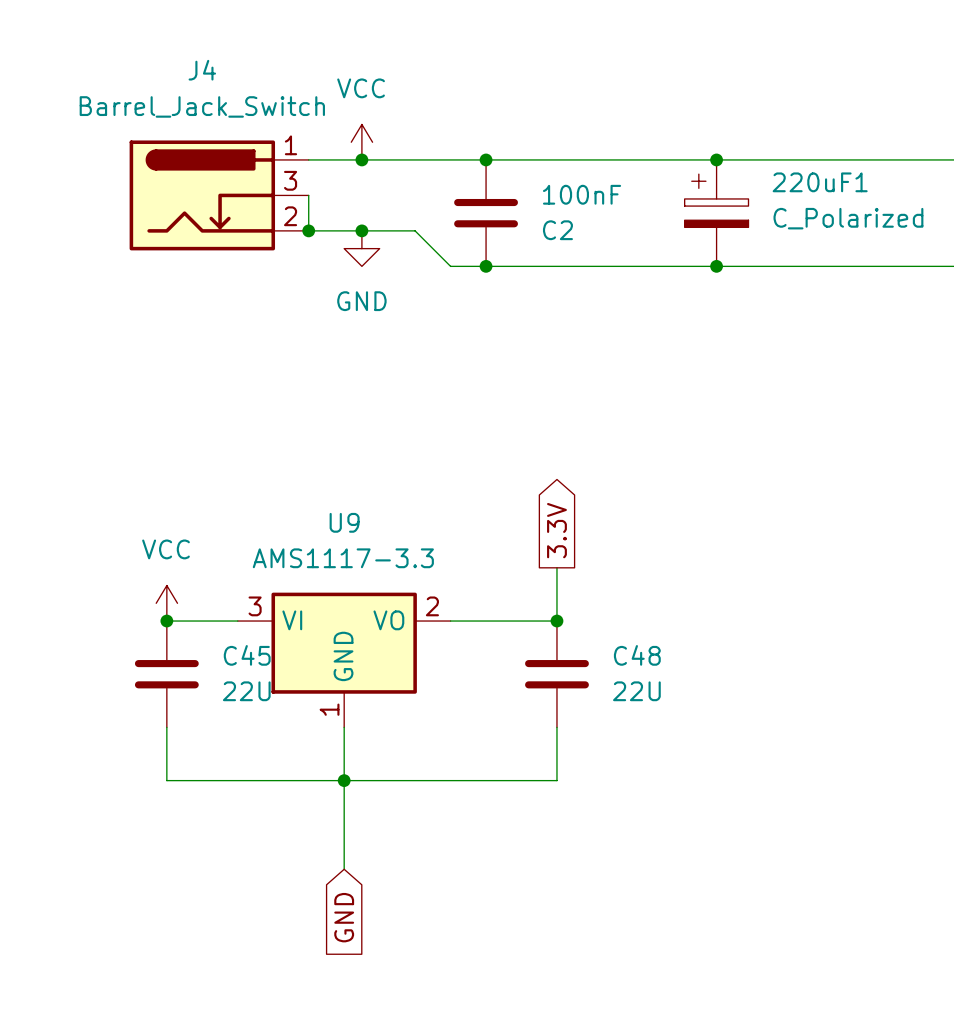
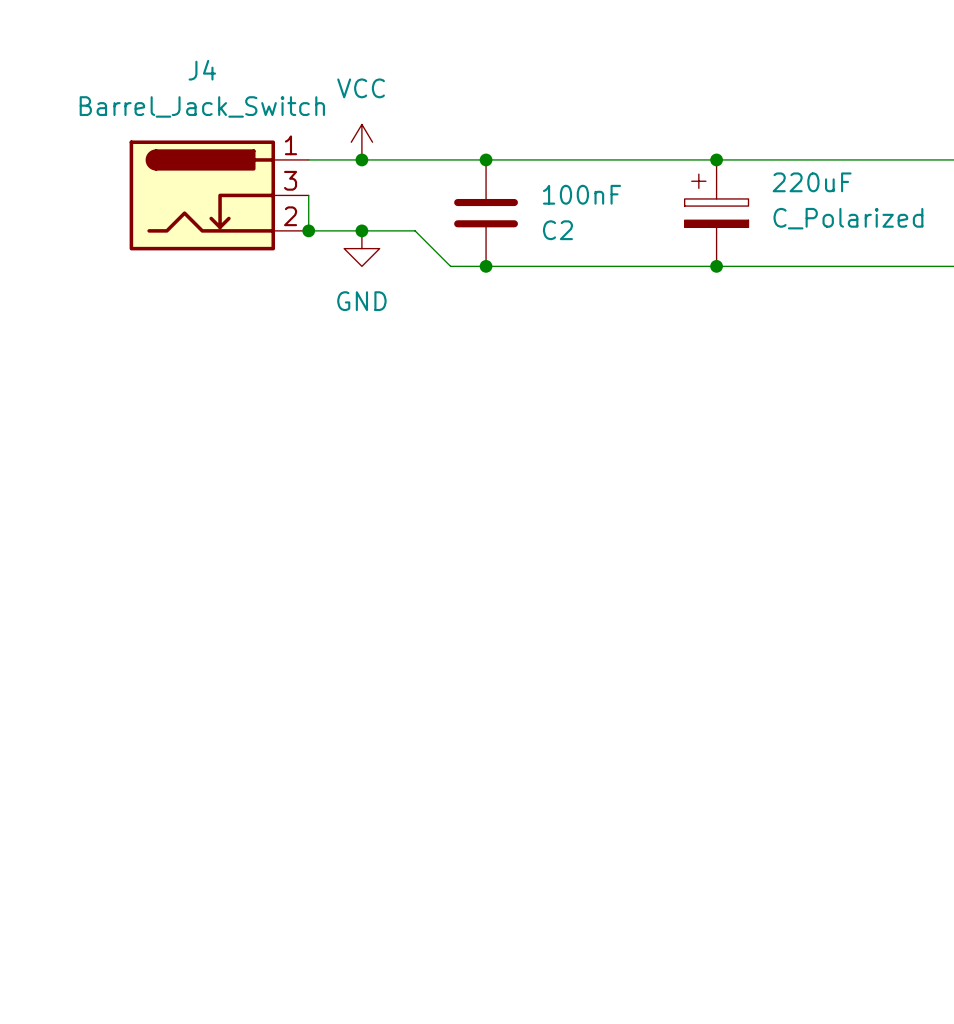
220uF1 name: 220uF1 (820, 182) -> 220uF (812, 182)
global label: 3.3V (556, 530) -> none
wire: (556, 567) (556, 621) (450, 621) -> none
power symbol: VCC (166, 603) -> none
wire: (166, 621) (237, 621) -> none
junction: (166, 621) -> none
junction: (556, 621) -> none
U9: AMS1117-3.3 (344, 660) -> none
C45: 22U (166, 674) -> none
C48: 22U (556, 674) -> none
wire: (166, 727) (166, 780) (556, 780) (556, 727) -> none
wire: (344, 727) (344, 869) -> none
junction: (344, 780) -> none
global label: GND (344, 917) -> none

